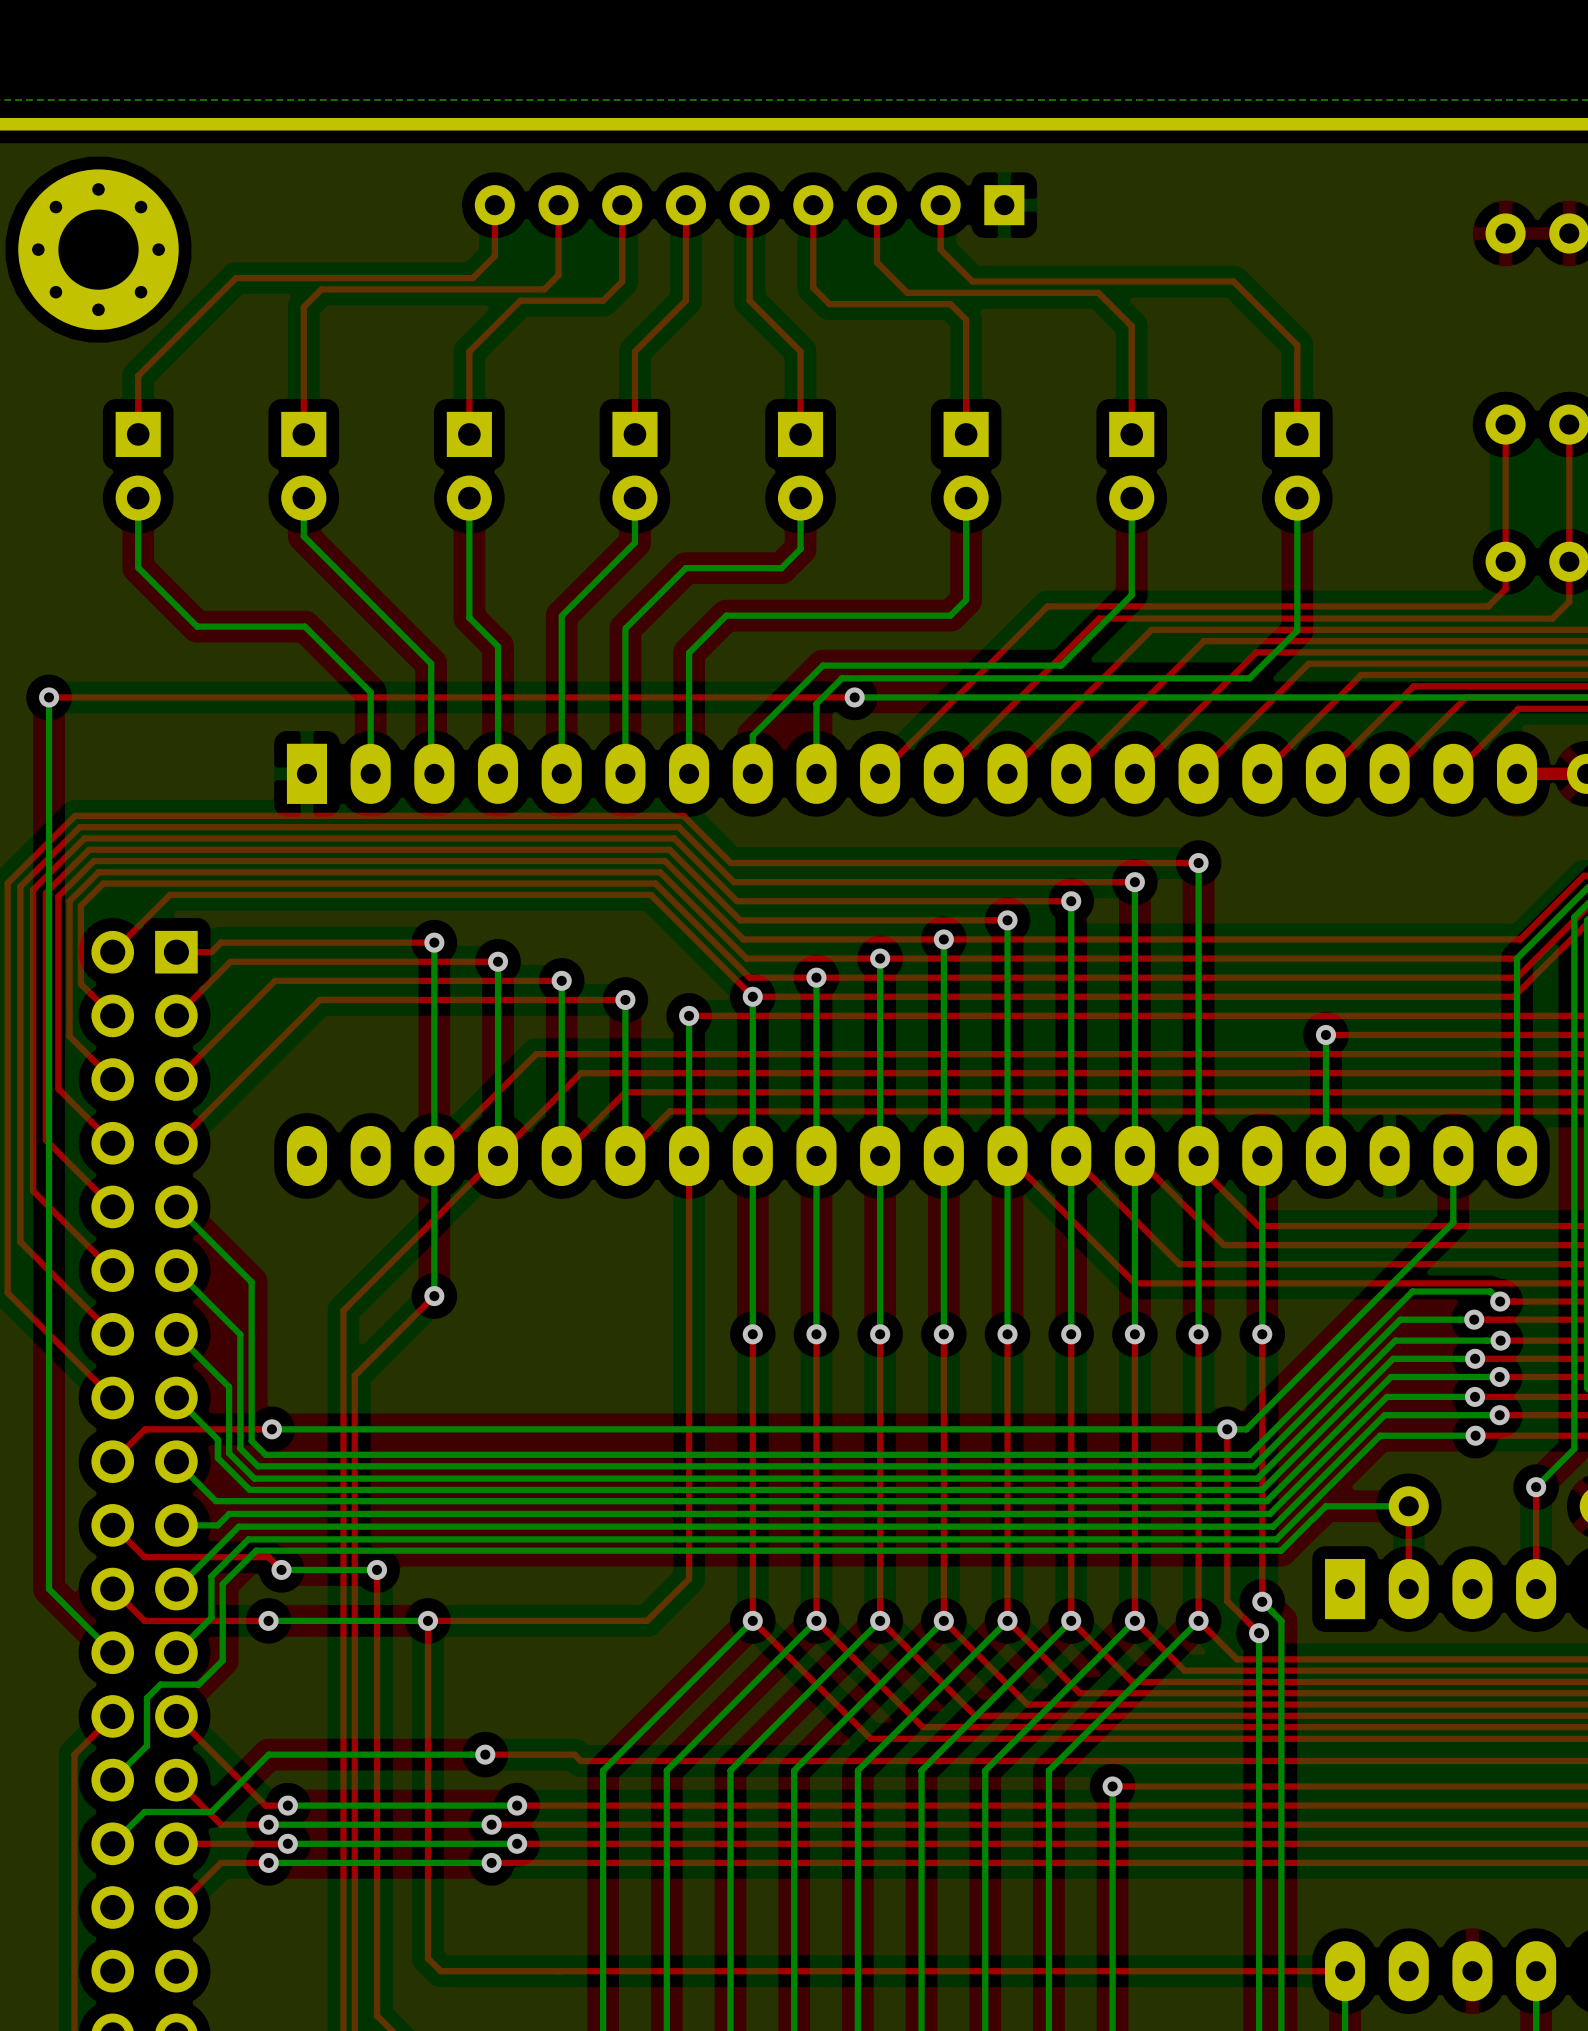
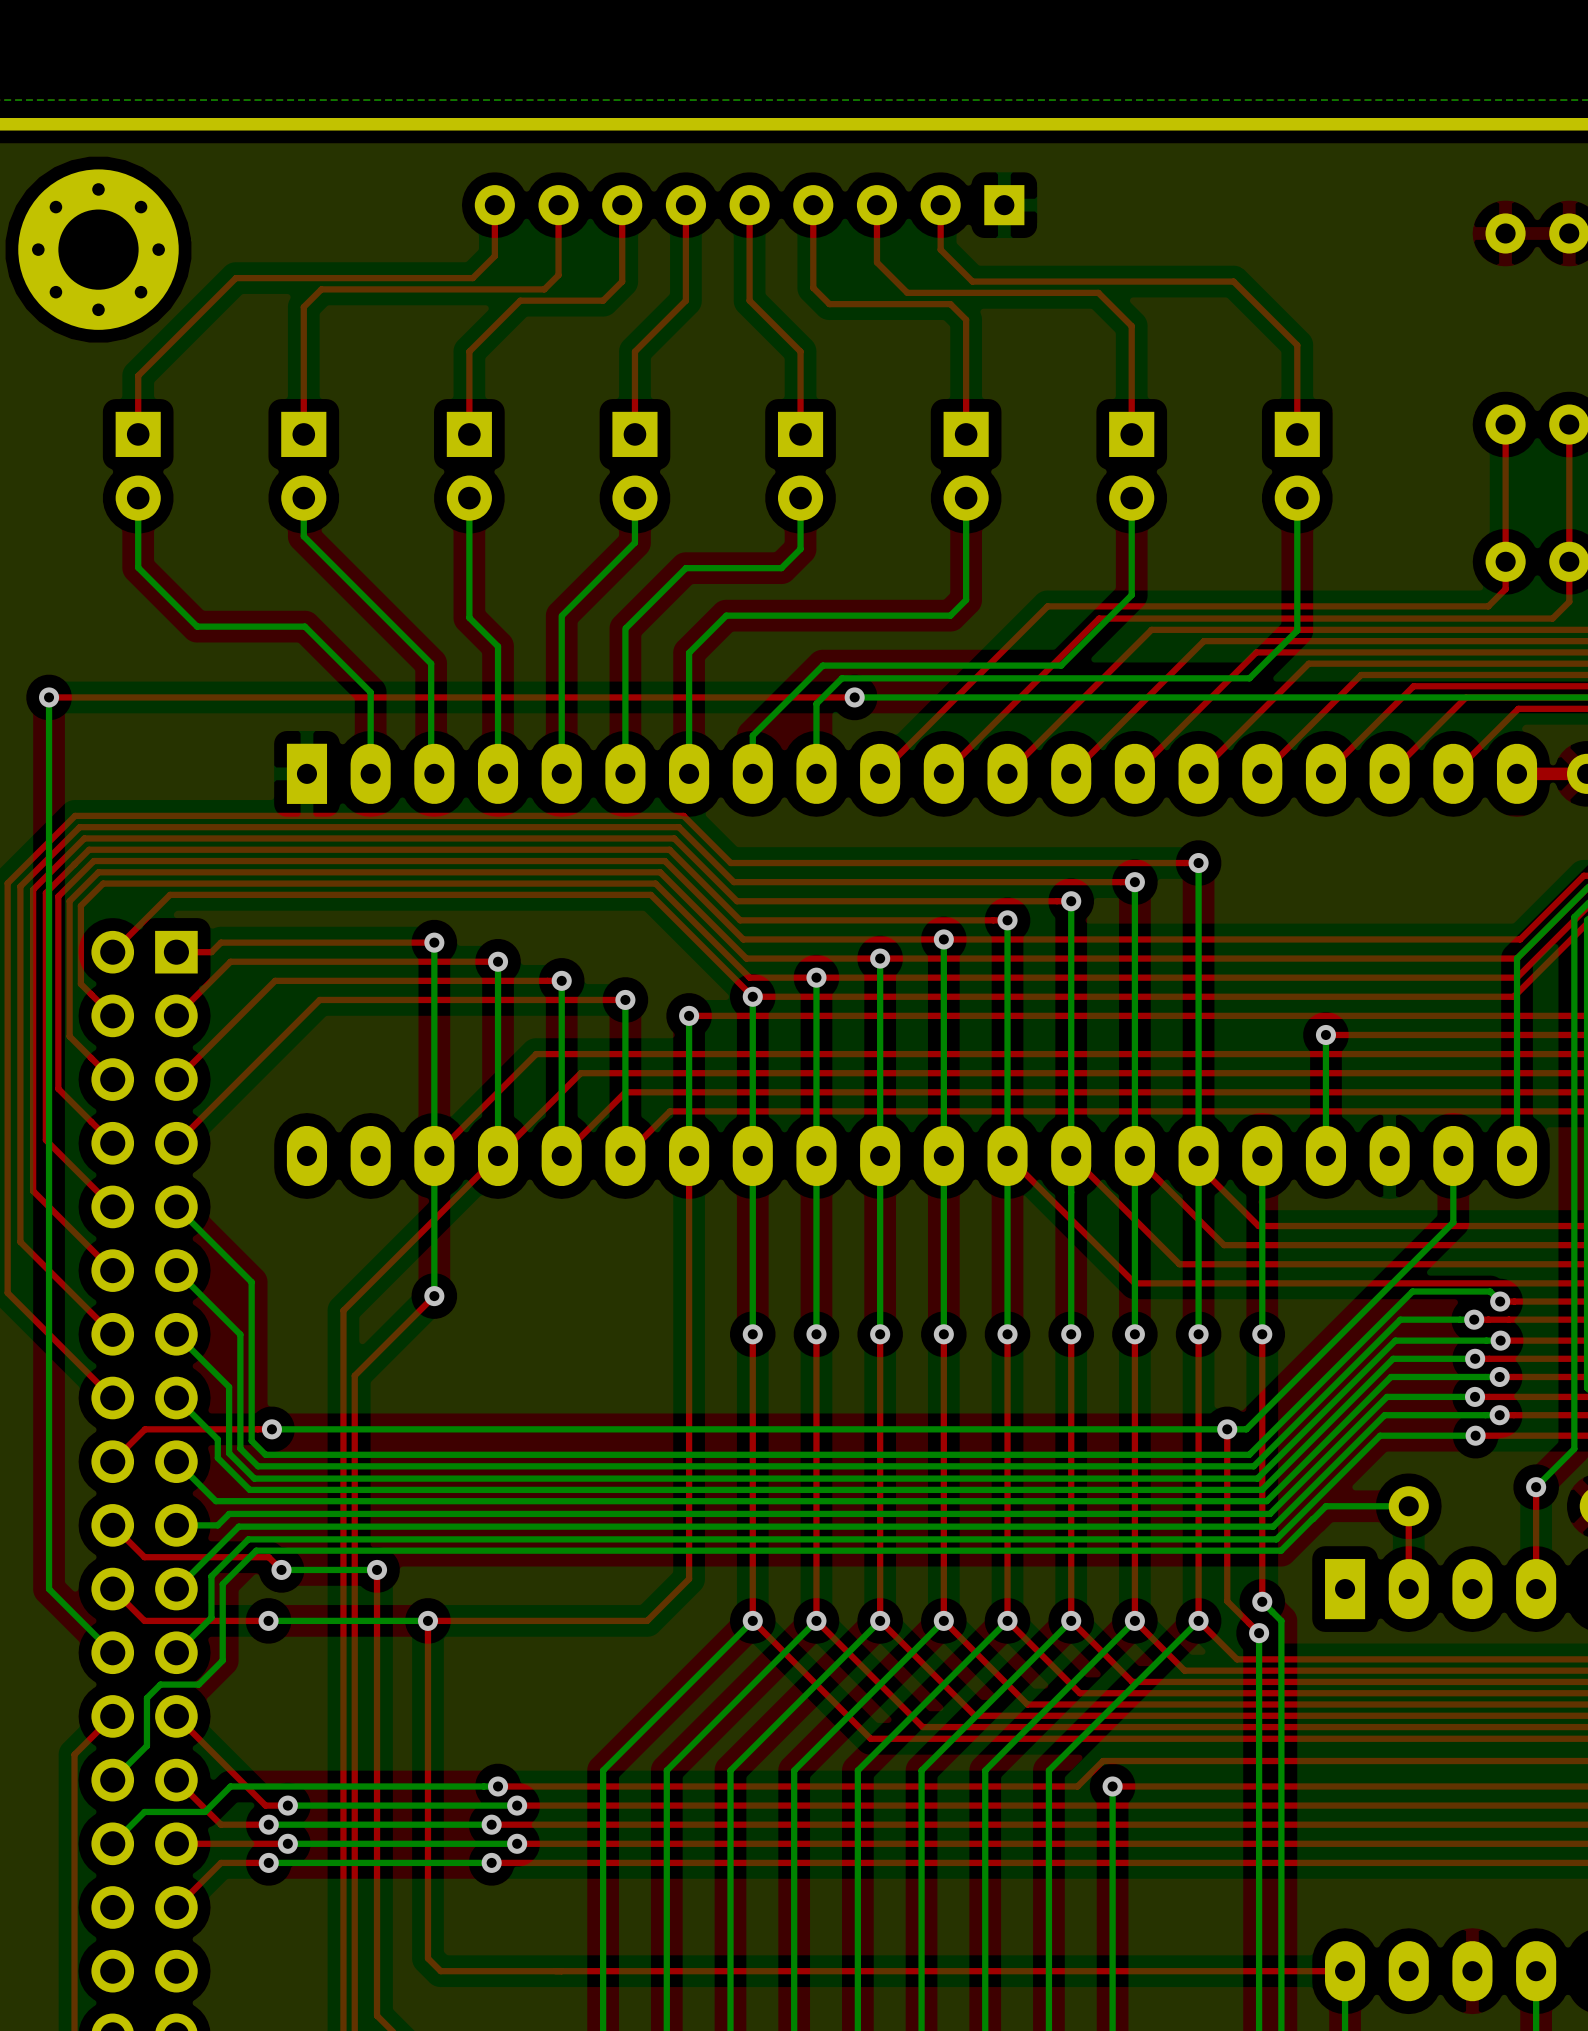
top track: (485, 1754) (574, 1754) (580, 1761) (1103, 1761) -> (498, 1786) (1077, 1786) (1103, 1761)
bottom track: (485, 1754) (268, 1754) (211, 1811) (205, 1811) -> (498, 1786) (230, 1786) (205, 1811)
via position: (485, 1754) -> (498, 1786)

